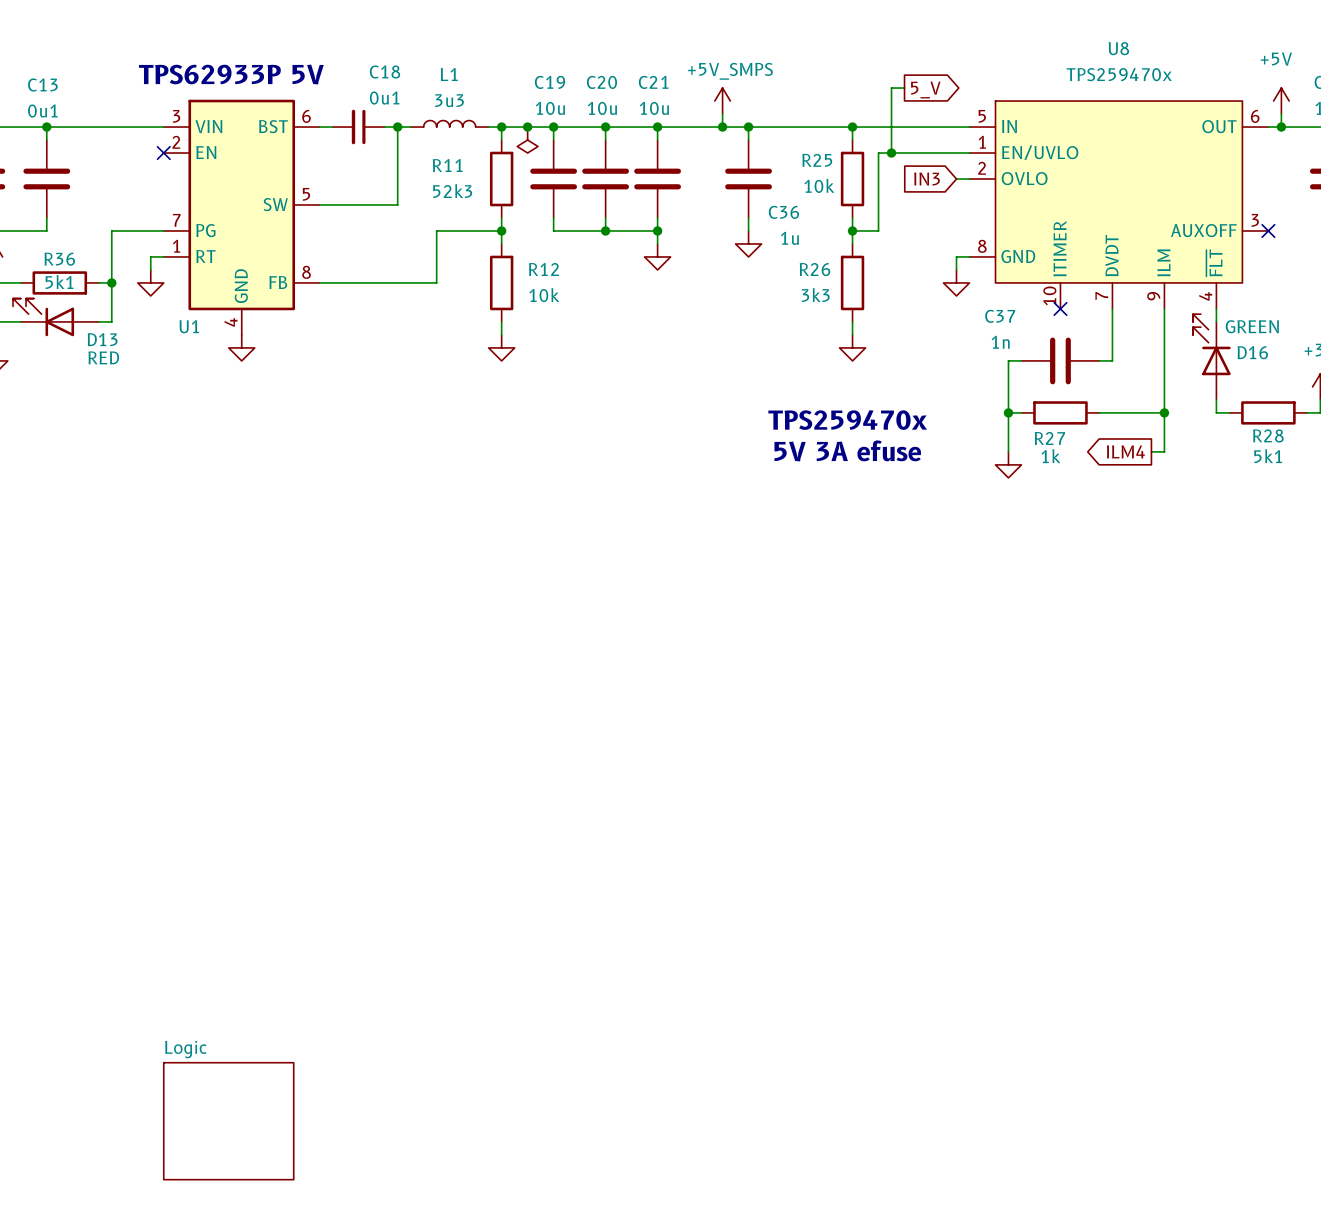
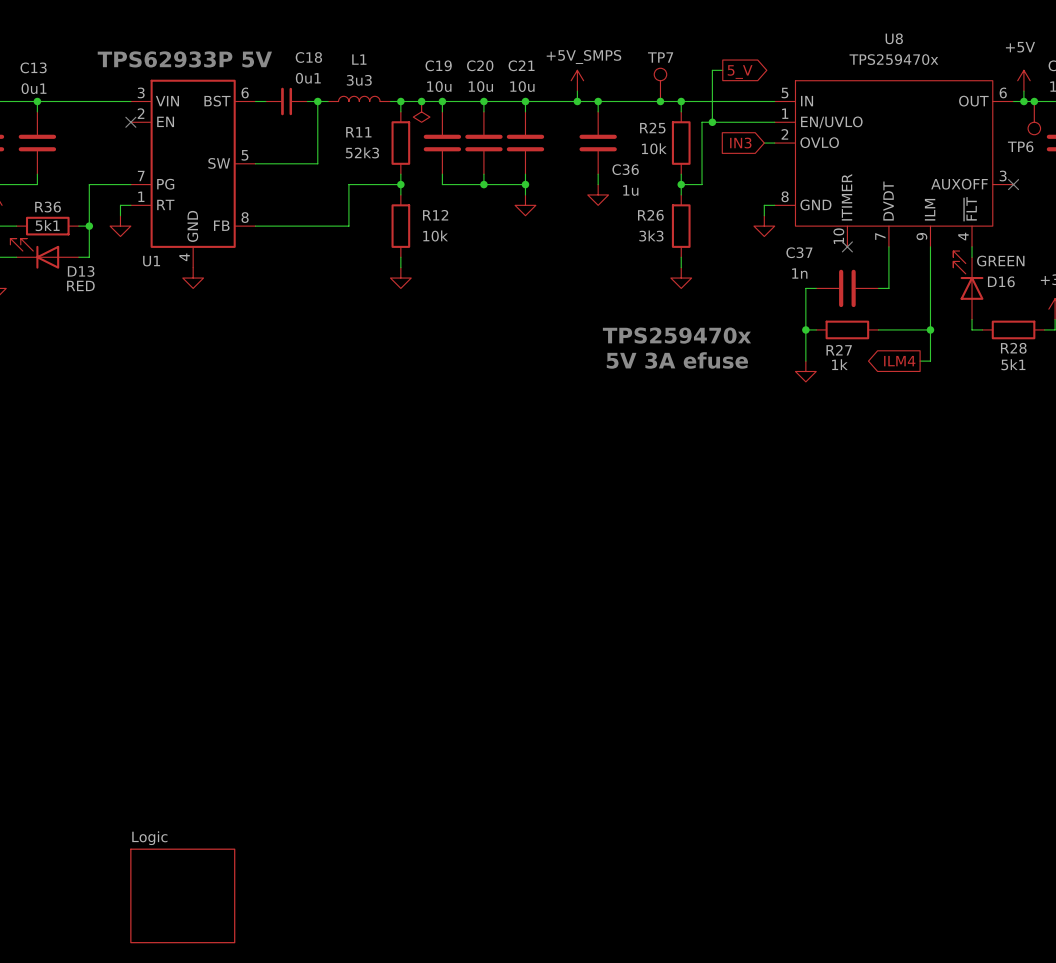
TP7: none -> (660, 84)
junction: none -> (660, 101)
junction: none -> (1034, 101)
TP6: none -> (1034, 118)

